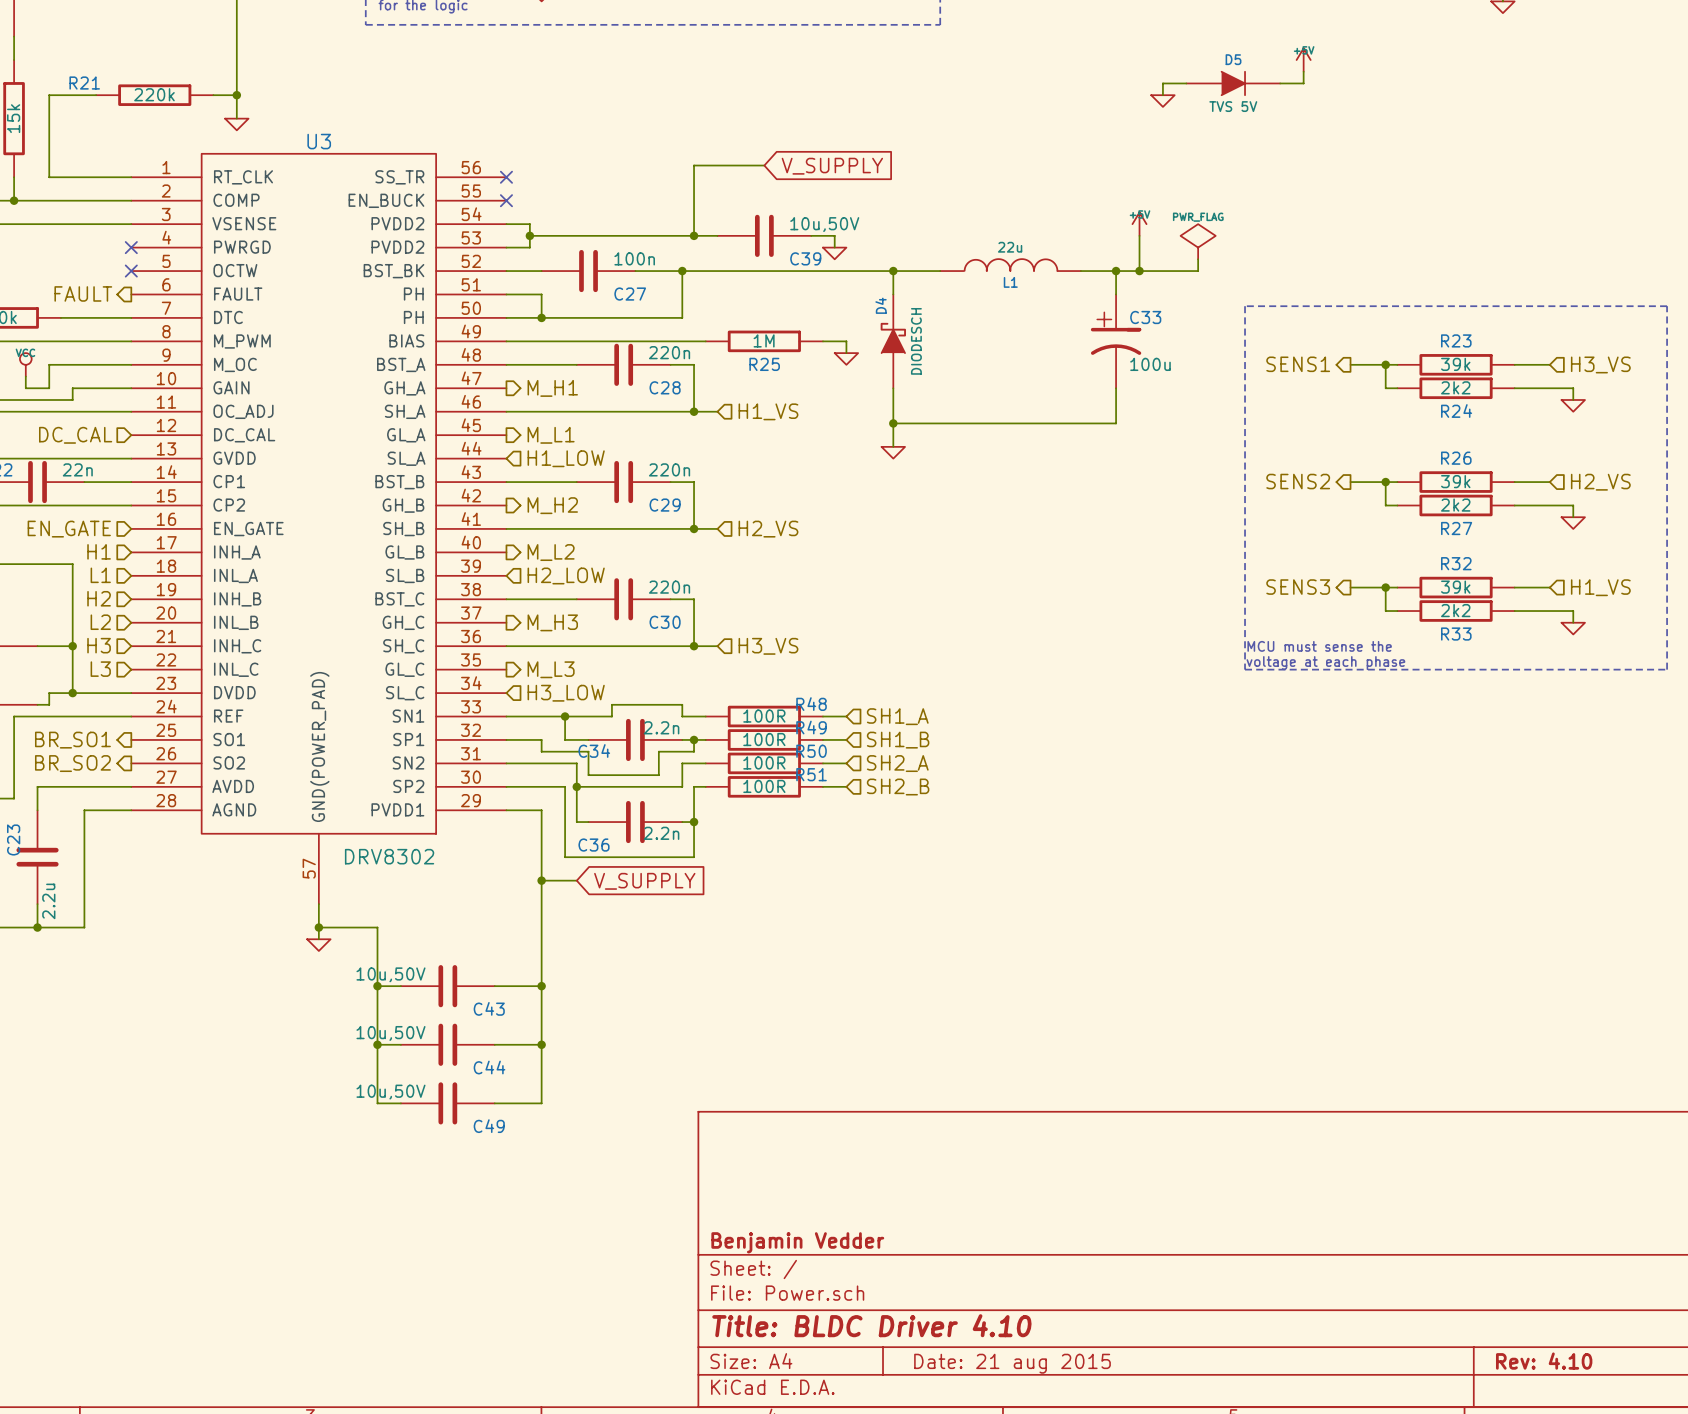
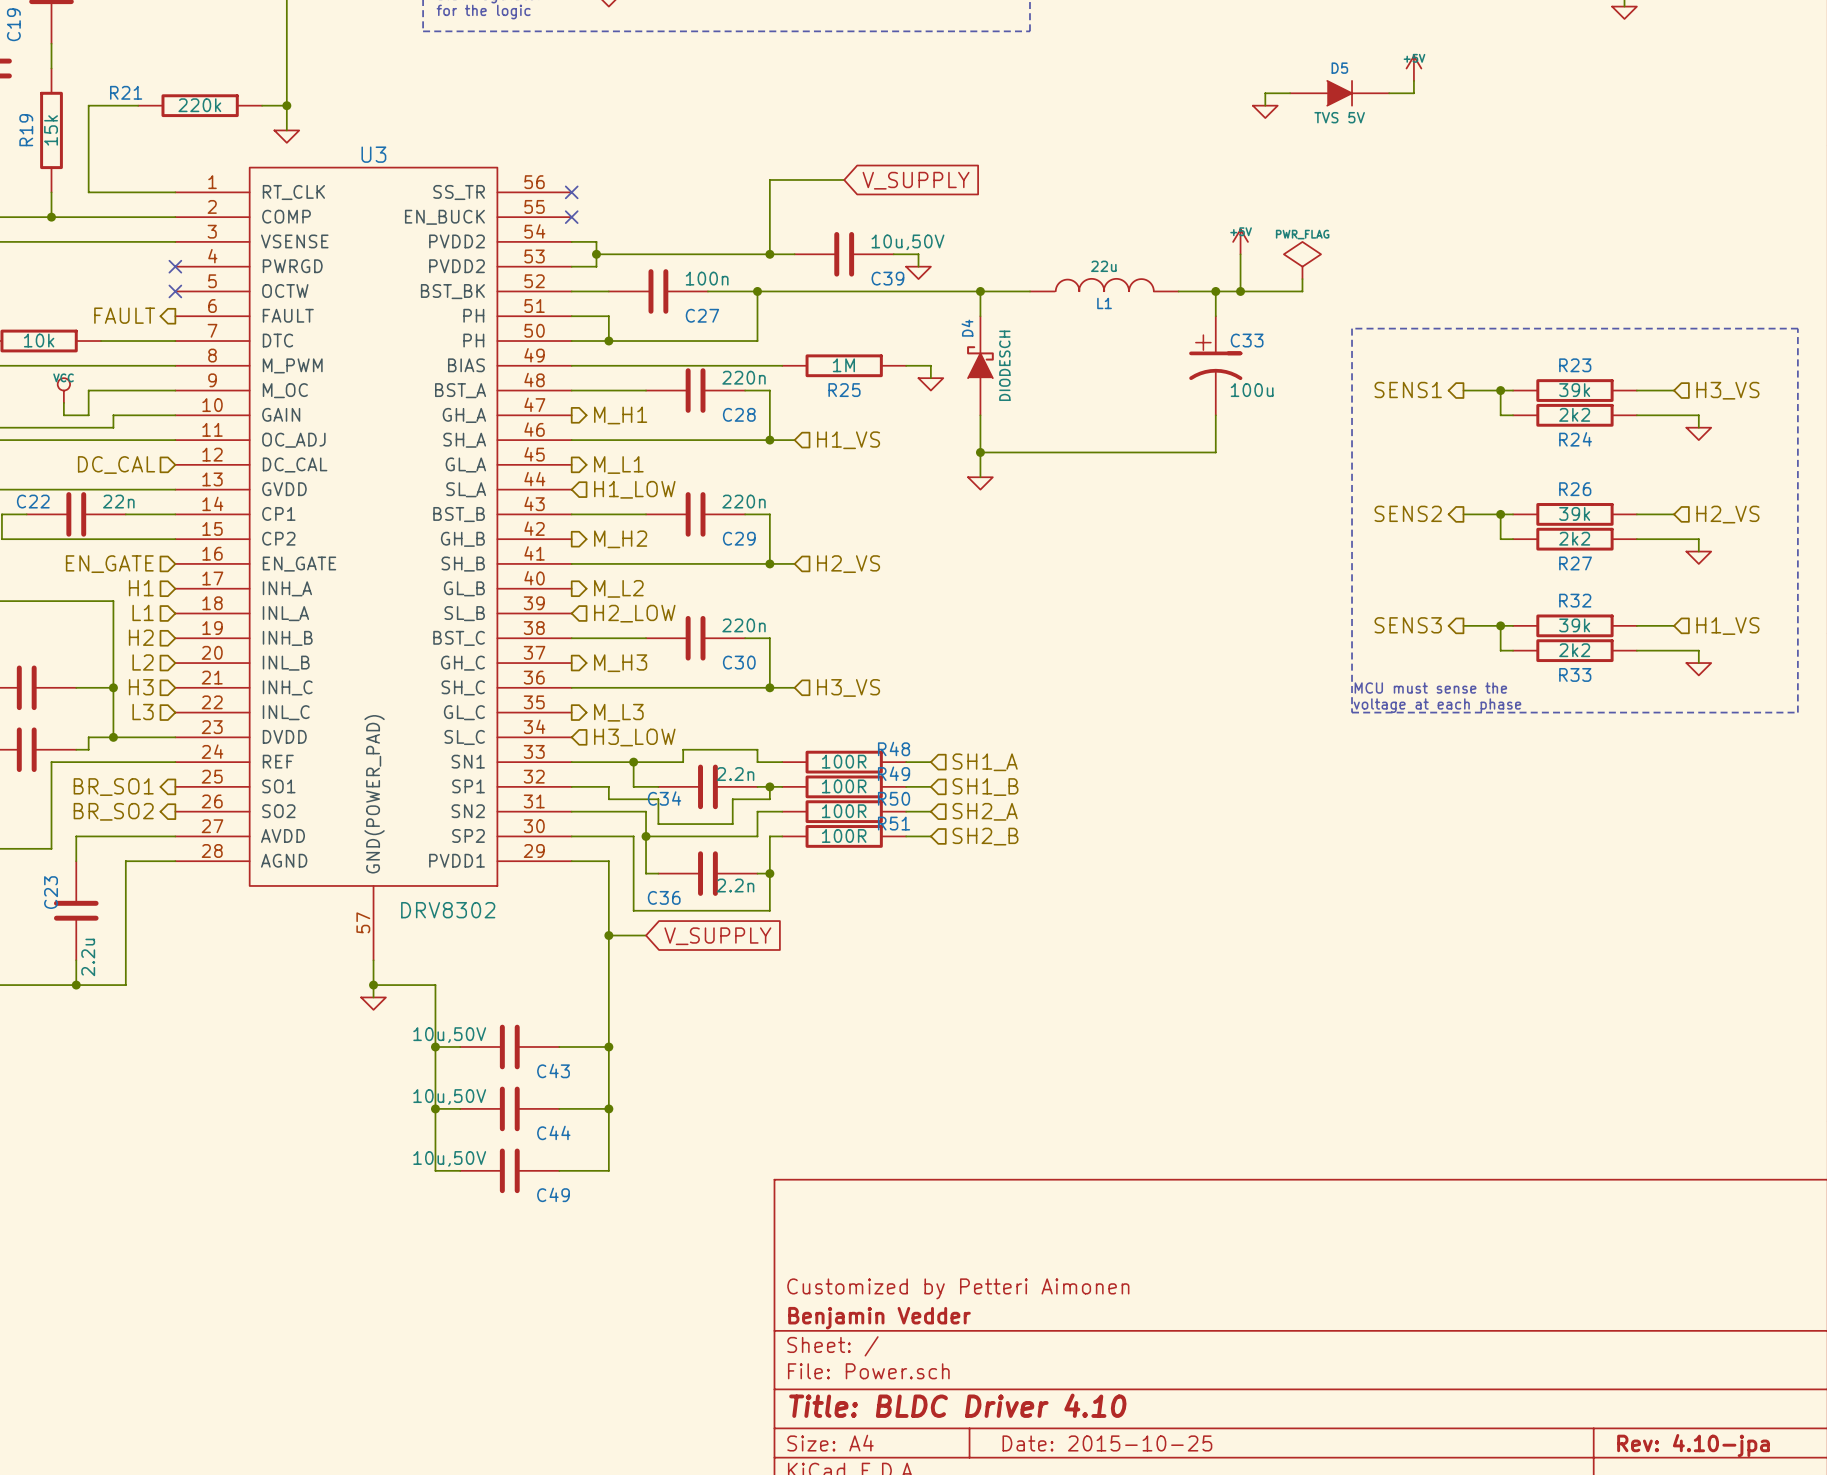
title block: none -> Customized by Petteri Aimonen (958, 1288)
title block: Rev: 4.10 (1544, 1361) -> Rev: 4.10-jpa (1693, 1445)
title block: Date: 21 aug 2015 (1012, 1363) -> Date: 2015-10-25 (1107, 1443)

